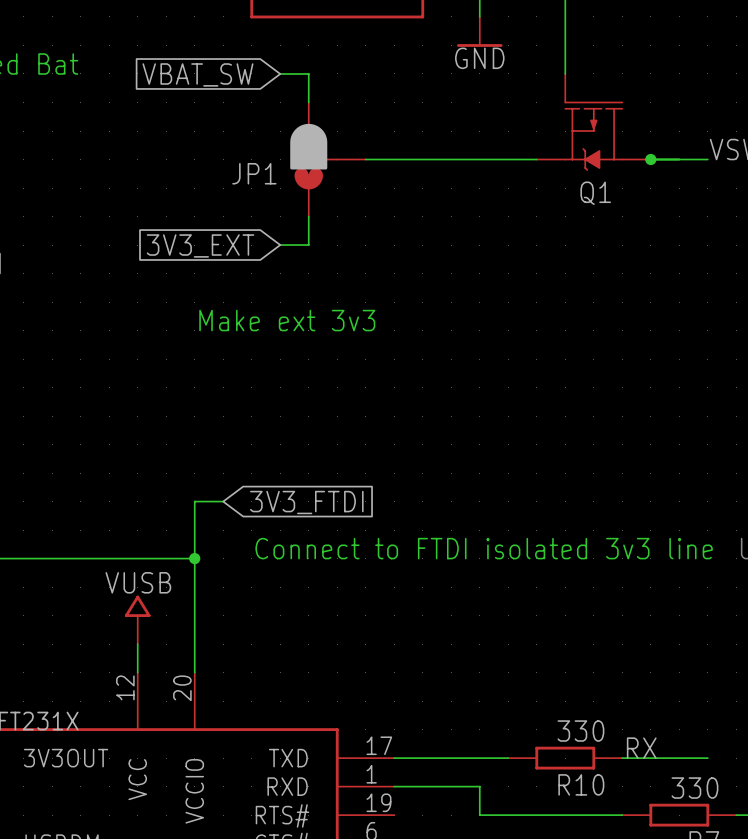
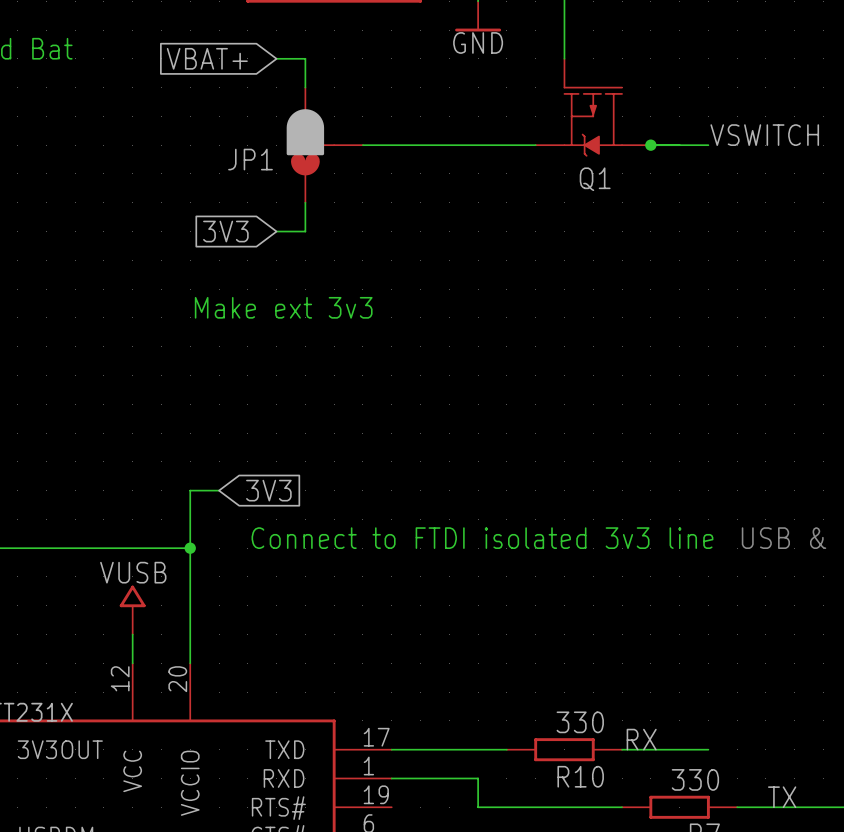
global label: VBAT_SW (197, 74) -> VBAT+ (207, 58)
global label: 3V3_EXT (200, 245) -> 3V3 (225, 231)
global label: 3V3_FTDI (306, 502) -> 3V3 (268, 490)

